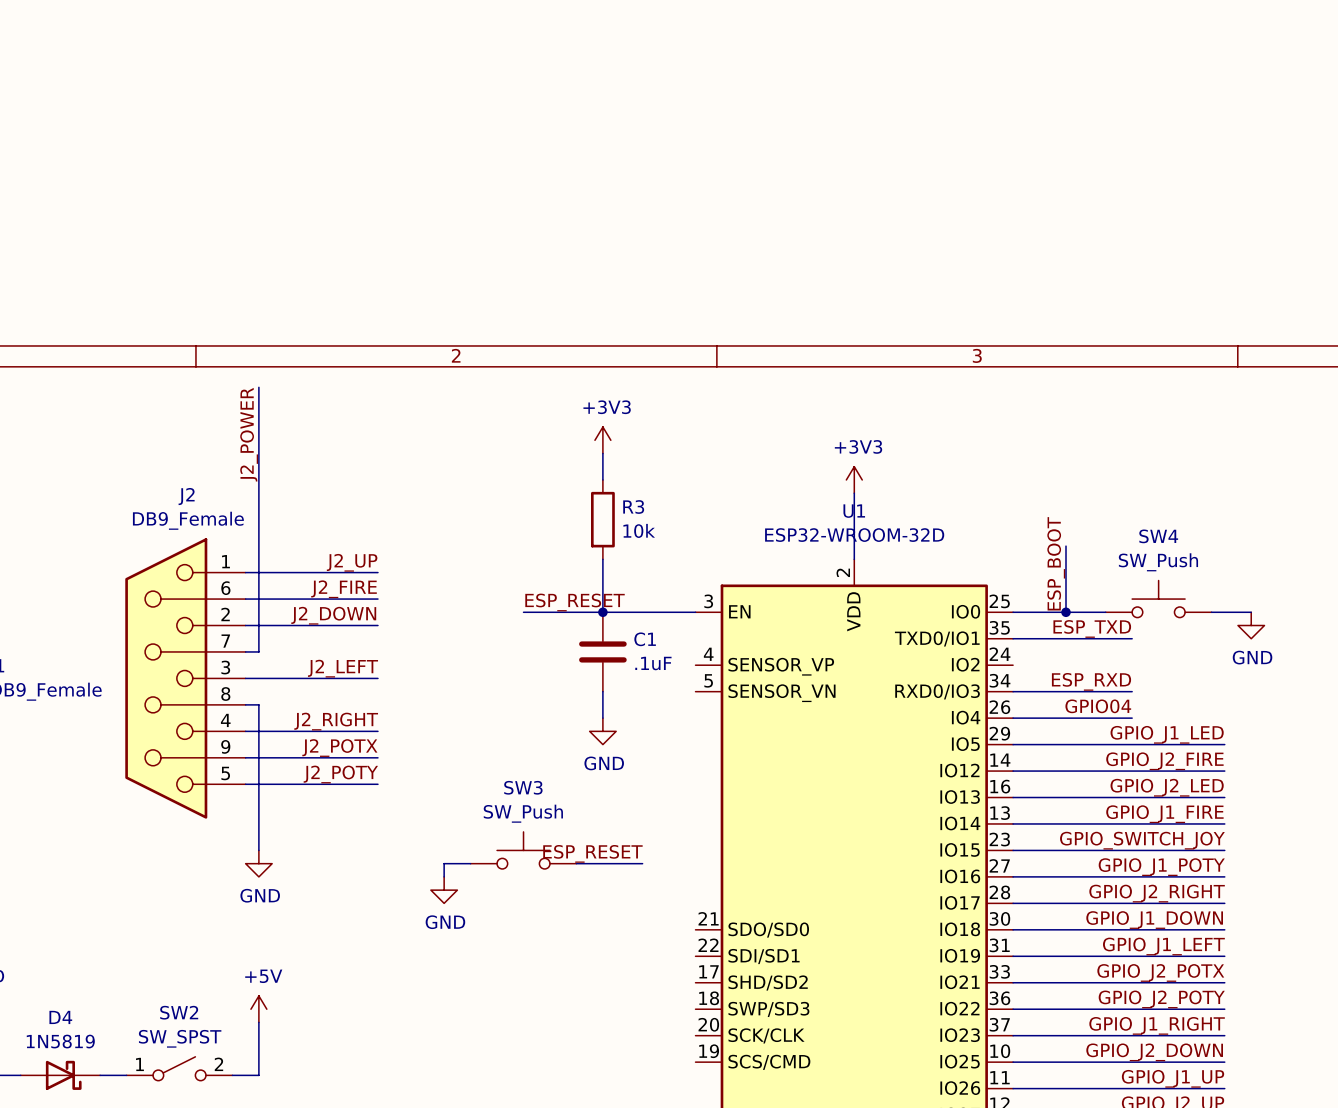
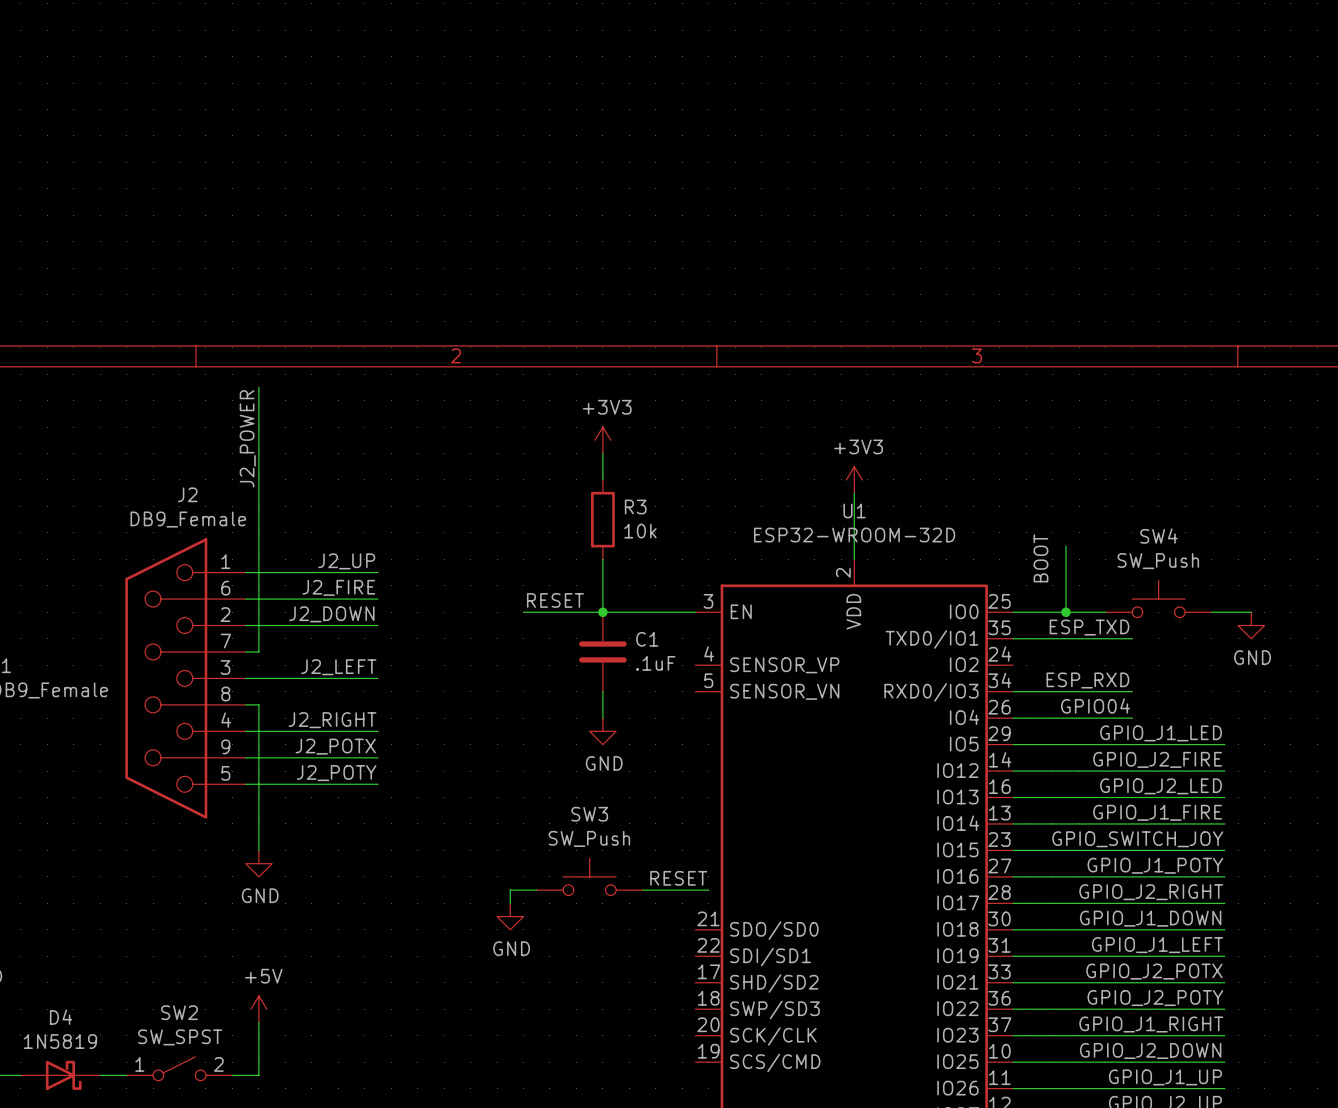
label: ESP_BOOT (1056, 563) -> BOOT (1040, 558)
label: ESP_RESET (575, 602) -> RESET (555, 600)
SW3 position: (523, 850) -> (589, 876)
label: ESP_RESET (592, 853) -> RESET (678, 878)
wire: (470, 863) (444, 863) (444, 876) -> (536, 890) (510, 890) (510, 903)
wire: (576, 863) (642, 863) -> (642, 890) (708, 890)
power symbol position: GND (444, 890) -> GND (510, 916)

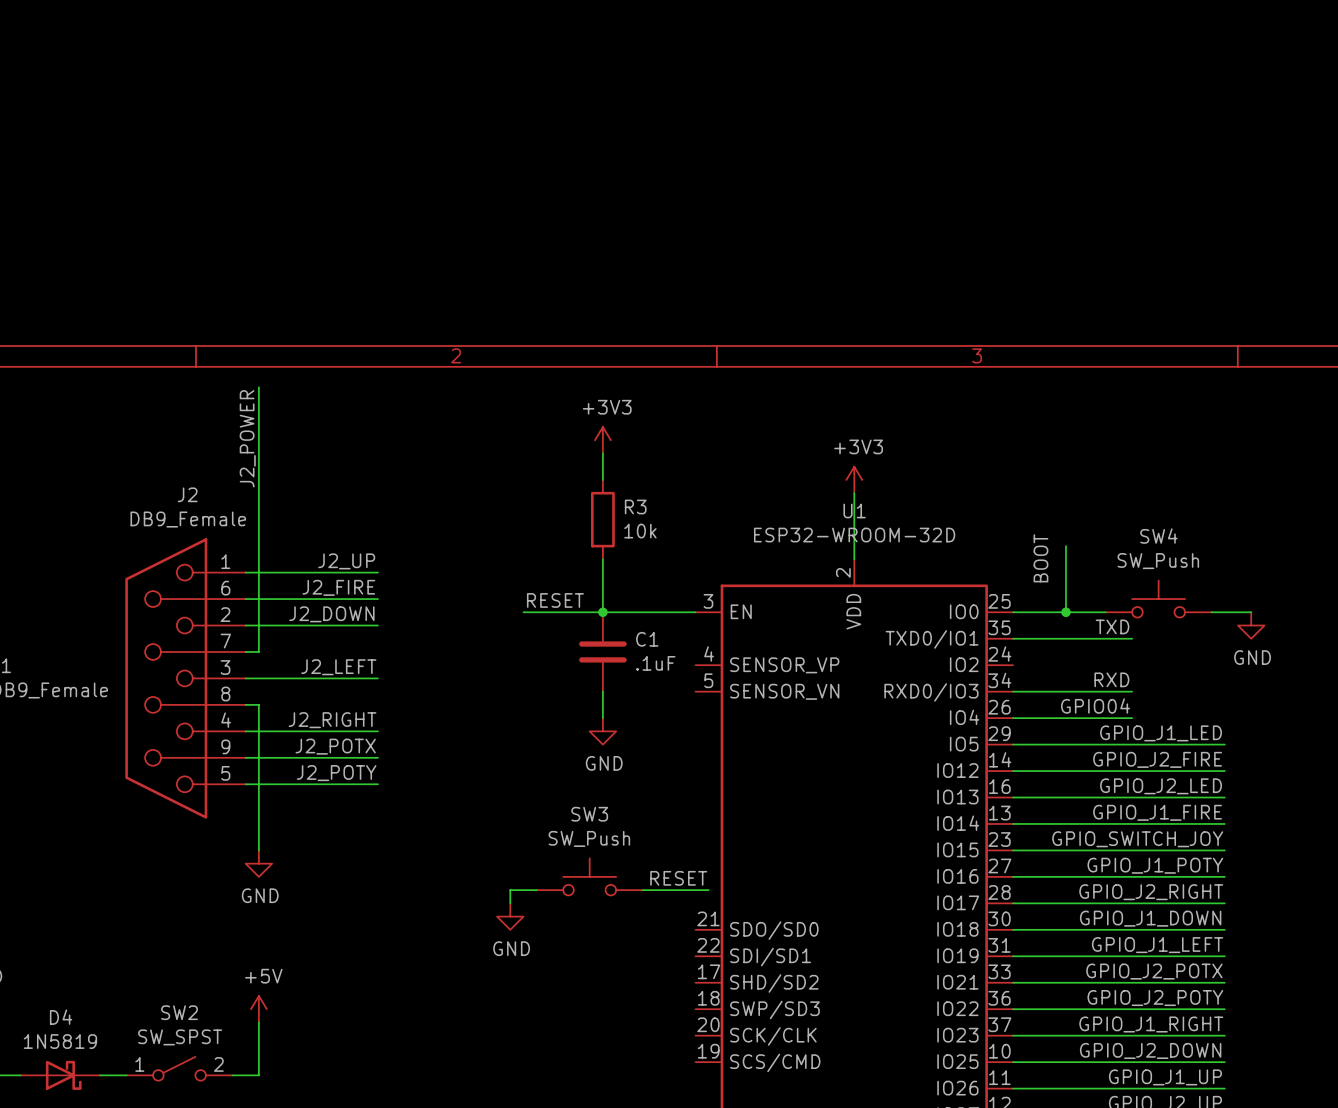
label: ESP_TXD (1089, 627) -> TXD (1112, 626)
label: ESP_RXD (1087, 680) -> RXD (1111, 679)

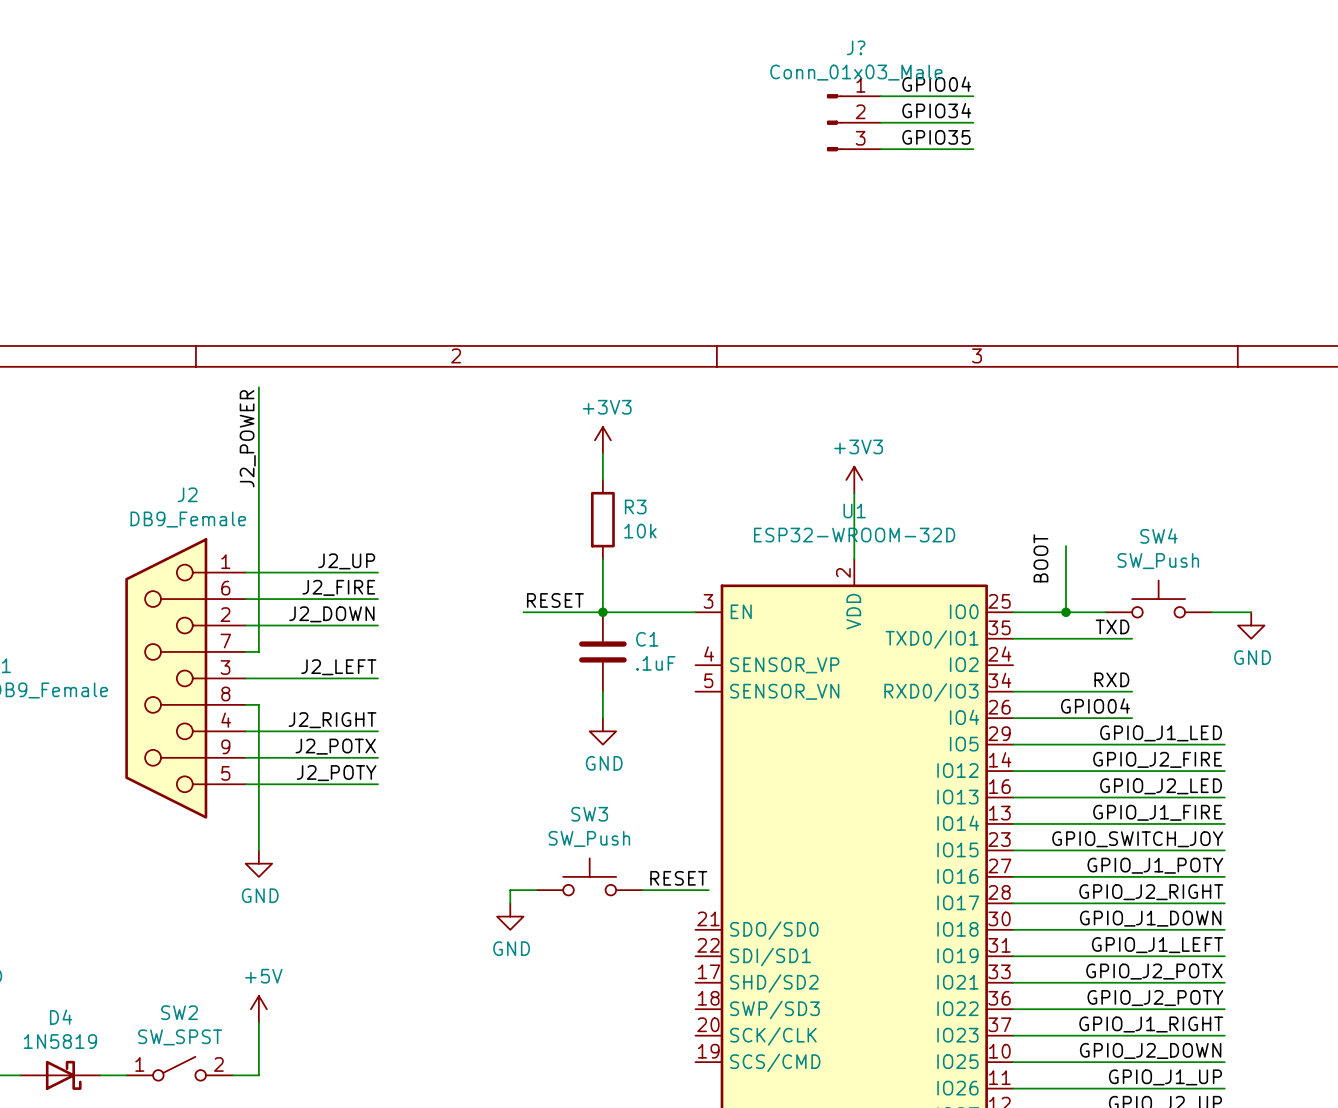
label: none -> GPIO04 (936, 84)
wire: none -> (880, 96) (973, 96)
label: none -> GPIO34 (936, 110)
J?: none -> Conn_01x03_Male (853, 122)
wire: none -> (880, 122) (973, 122)
label: none -> GPIO35 (936, 137)
wire: none -> (880, 149) (973, 149)

